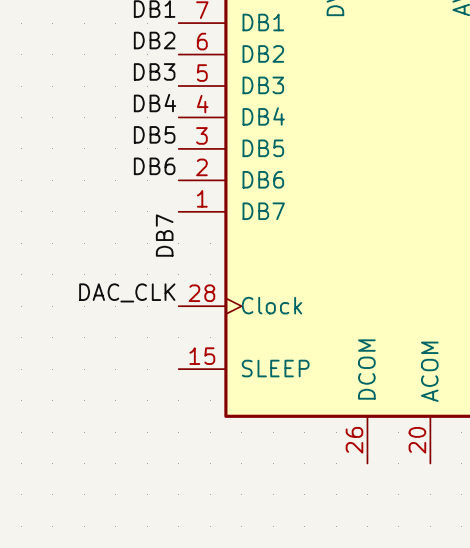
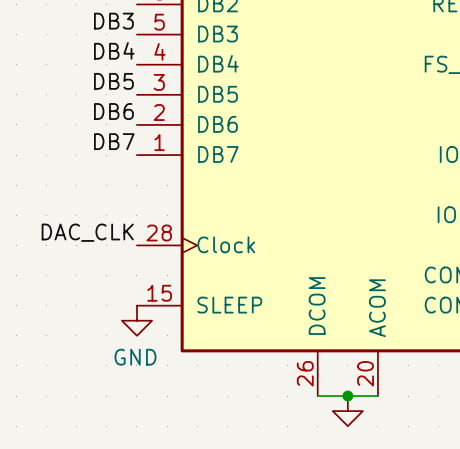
label rotation: 0° (164, 235) -> 90° clockwise (114, 141)
power symbol: none -> GND (136, 320)
wire: none -> (317, 396) (377, 396)
junction: none -> (347, 396)
power symbol: none -> (347, 411)

